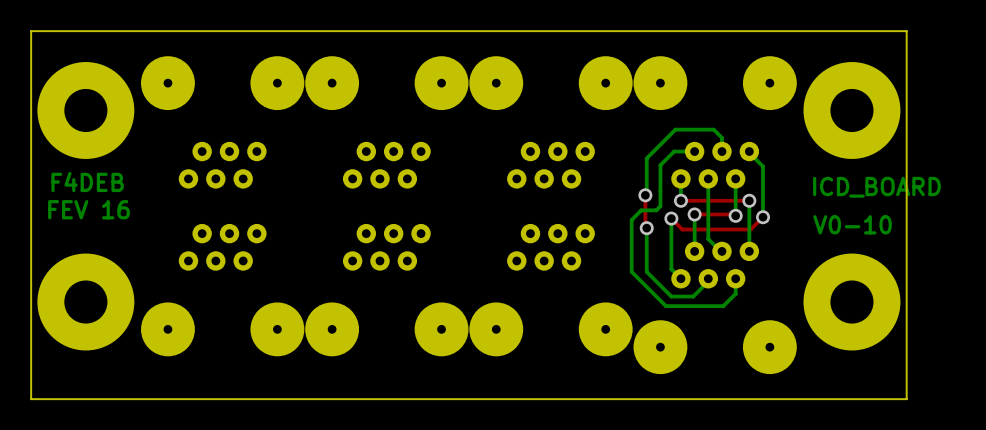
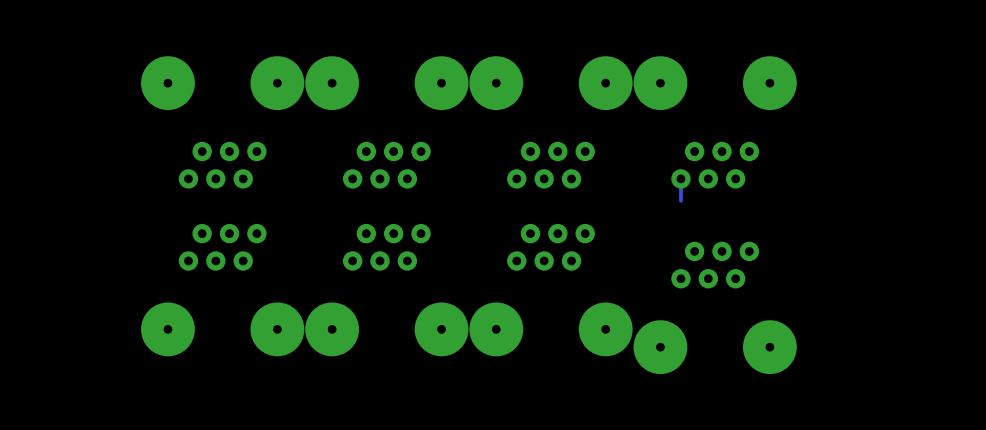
board edge: (906, 31) (906, 399) (31, 399) (31, 31) (906, 31) -> none
part: (85, 110) -> none
part: (851, 110) -> none
bottom track: (694, 151) (674, 151) (660, 165) (660, 206) (656, 210) (641, 210) (631, 219) (631, 271) (665, 306) (723, 306) (735, 293) (735, 278) -> none
bottom track: (721, 151) (721, 137) (713, 129) (675, 129) (646, 158) (645, 195) -> none
bottom track: (749, 152) (763, 166) (763, 217) -> none
bottom track: (708, 178) (708, 239) (721, 251) -> none
bottom track: (735, 178) (735, 215) -> none
text: F4DEB (87, 182) -> none
text: ICD_BOARD (876, 187) -> none
top track: (645, 195) (646, 228) -> none
via: (645, 195) -> none
via: (680, 200) -> none
bottom track: (749, 200) (749, 251) -> none
top track: (749, 200) (680, 200) -> none
via: (749, 200) -> none
text: FEV 16 (88, 209) -> none
bottom track: (694, 214) (694, 251) -> none
top track: (694, 214) (735, 215) -> none
via: (694, 214) -> none
via: (735, 215) -> none
top track: (763, 217) (750, 229) (682, 229) (671, 218) -> none
via: (763, 217) -> none
bottom track: (671, 218) (671, 269) (680, 278) (680, 274) -> none
via: (671, 218) -> none
text: V0-10 (852, 224) -> none
bottom track: (646, 228) (646, 271) (671, 296) (693, 296) (708, 281) -> none
via: (646, 228) -> none
part: (85, 302) -> none
part: (851, 302) -> none

